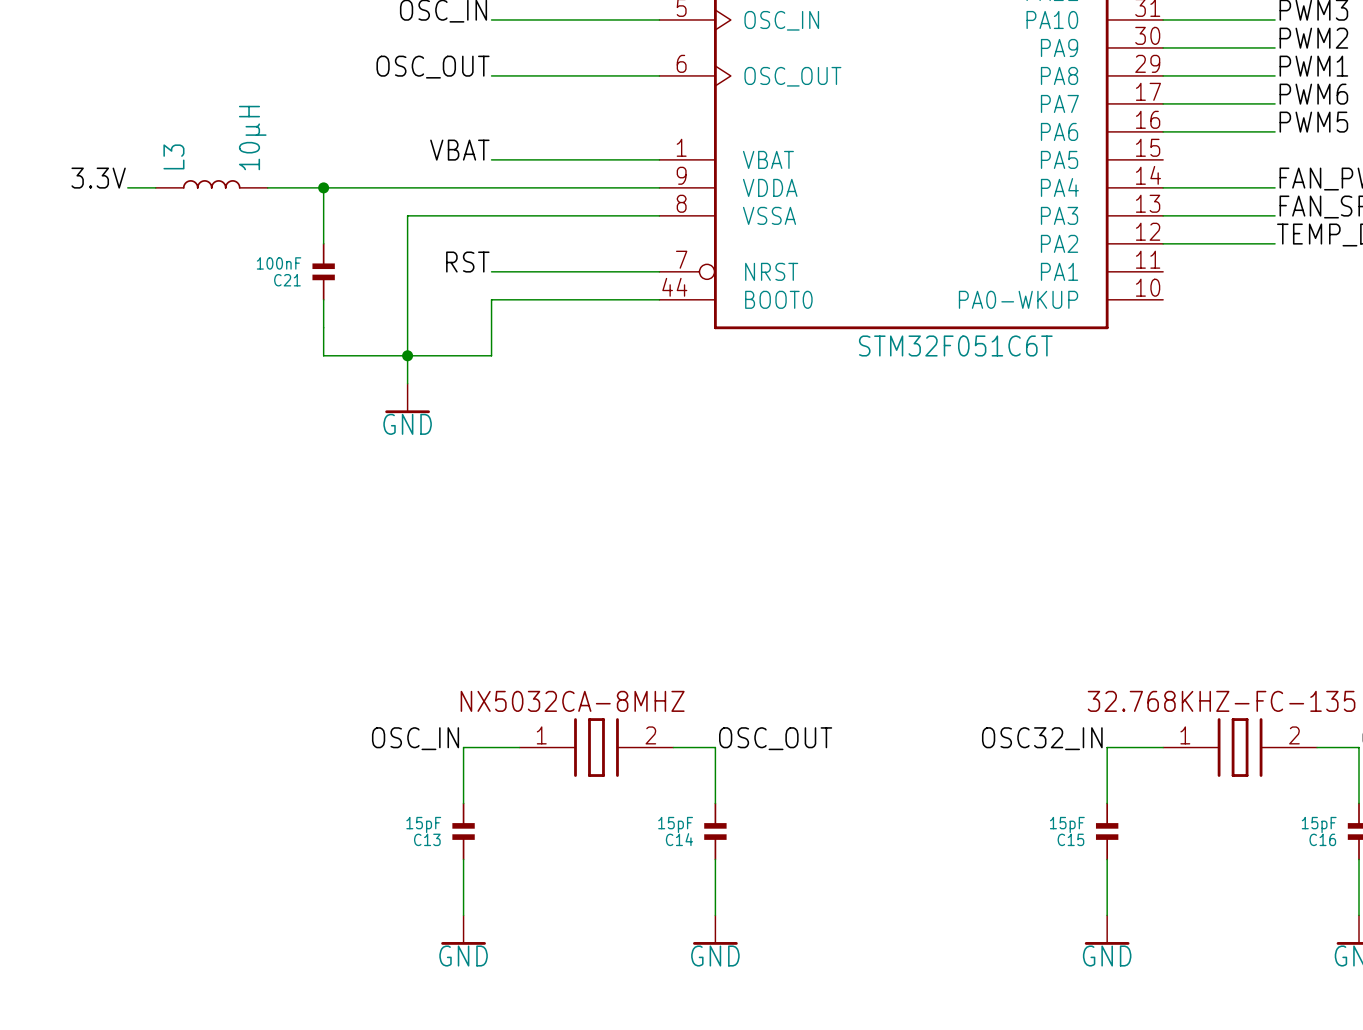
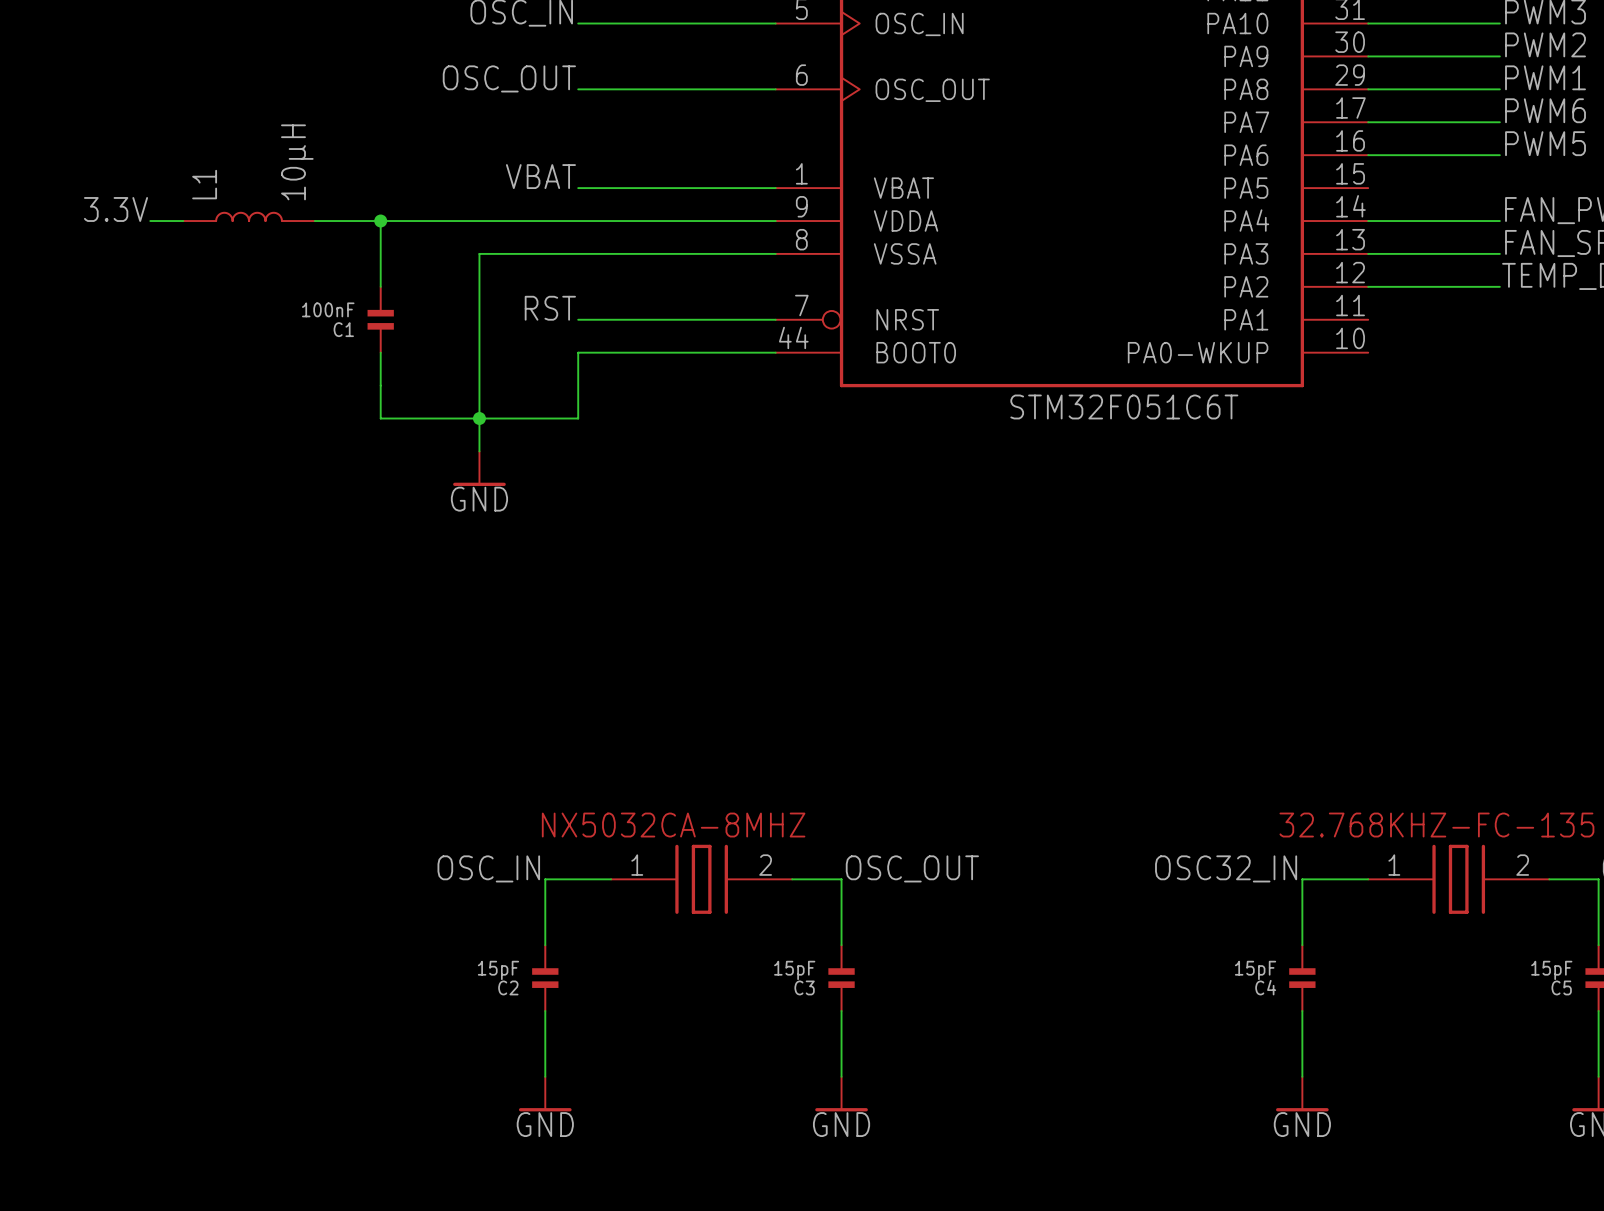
L3 name: L3 (173, 156) -> L1 (204, 184)
C21 name: C21 (287, 280) -> C1 (343, 329)
C13 name: C13 (427, 839) -> C2 (508, 987)
C14 name: C14 (679, 839) -> C3 (804, 987)
C15 name: C15 (1070, 839) -> C4 (1265, 987)
C16 name: C16 (1322, 839) -> C5 (1561, 987)

